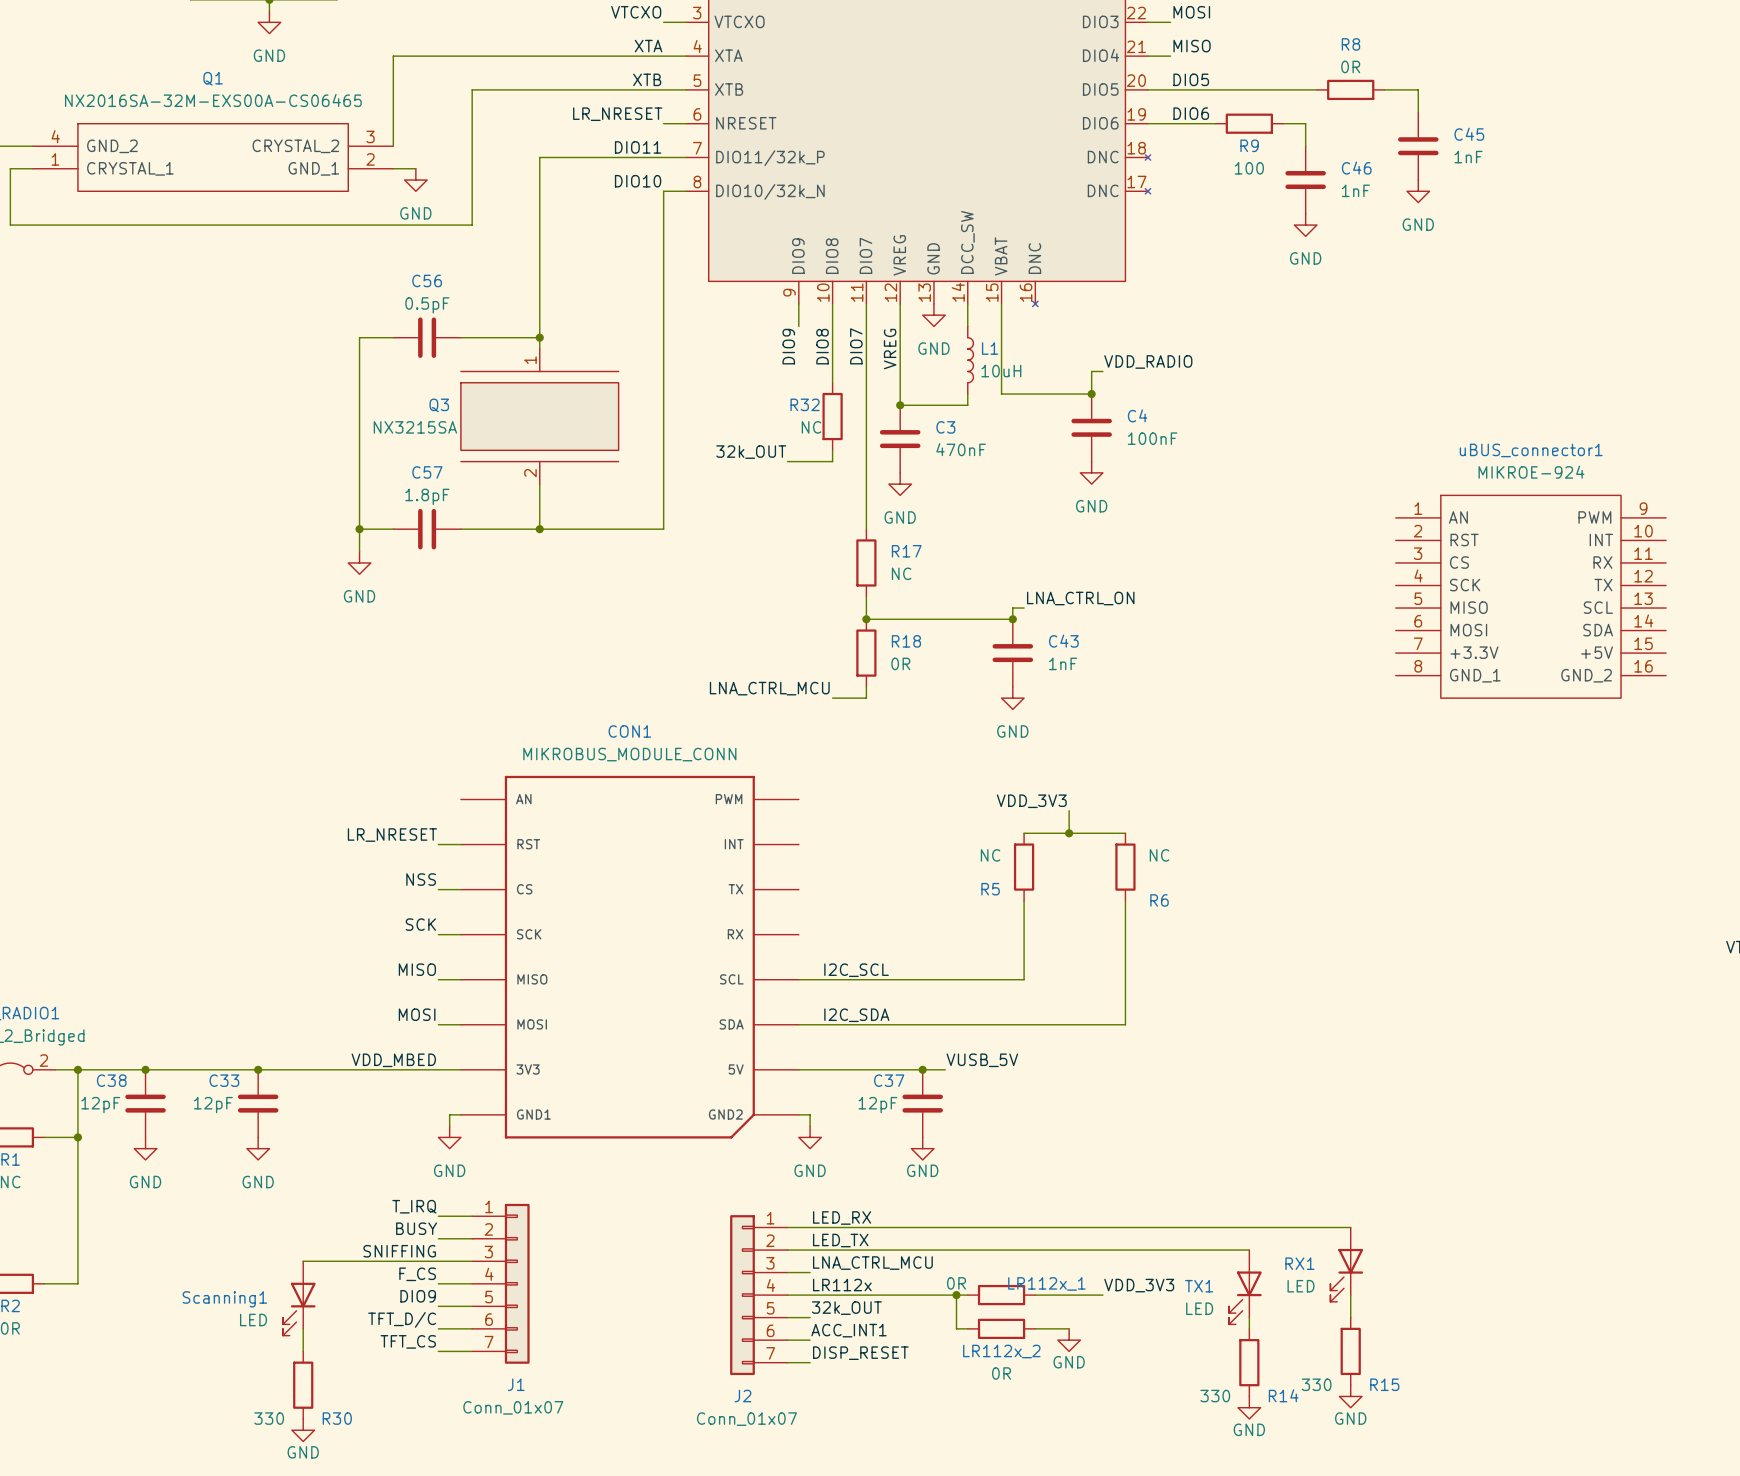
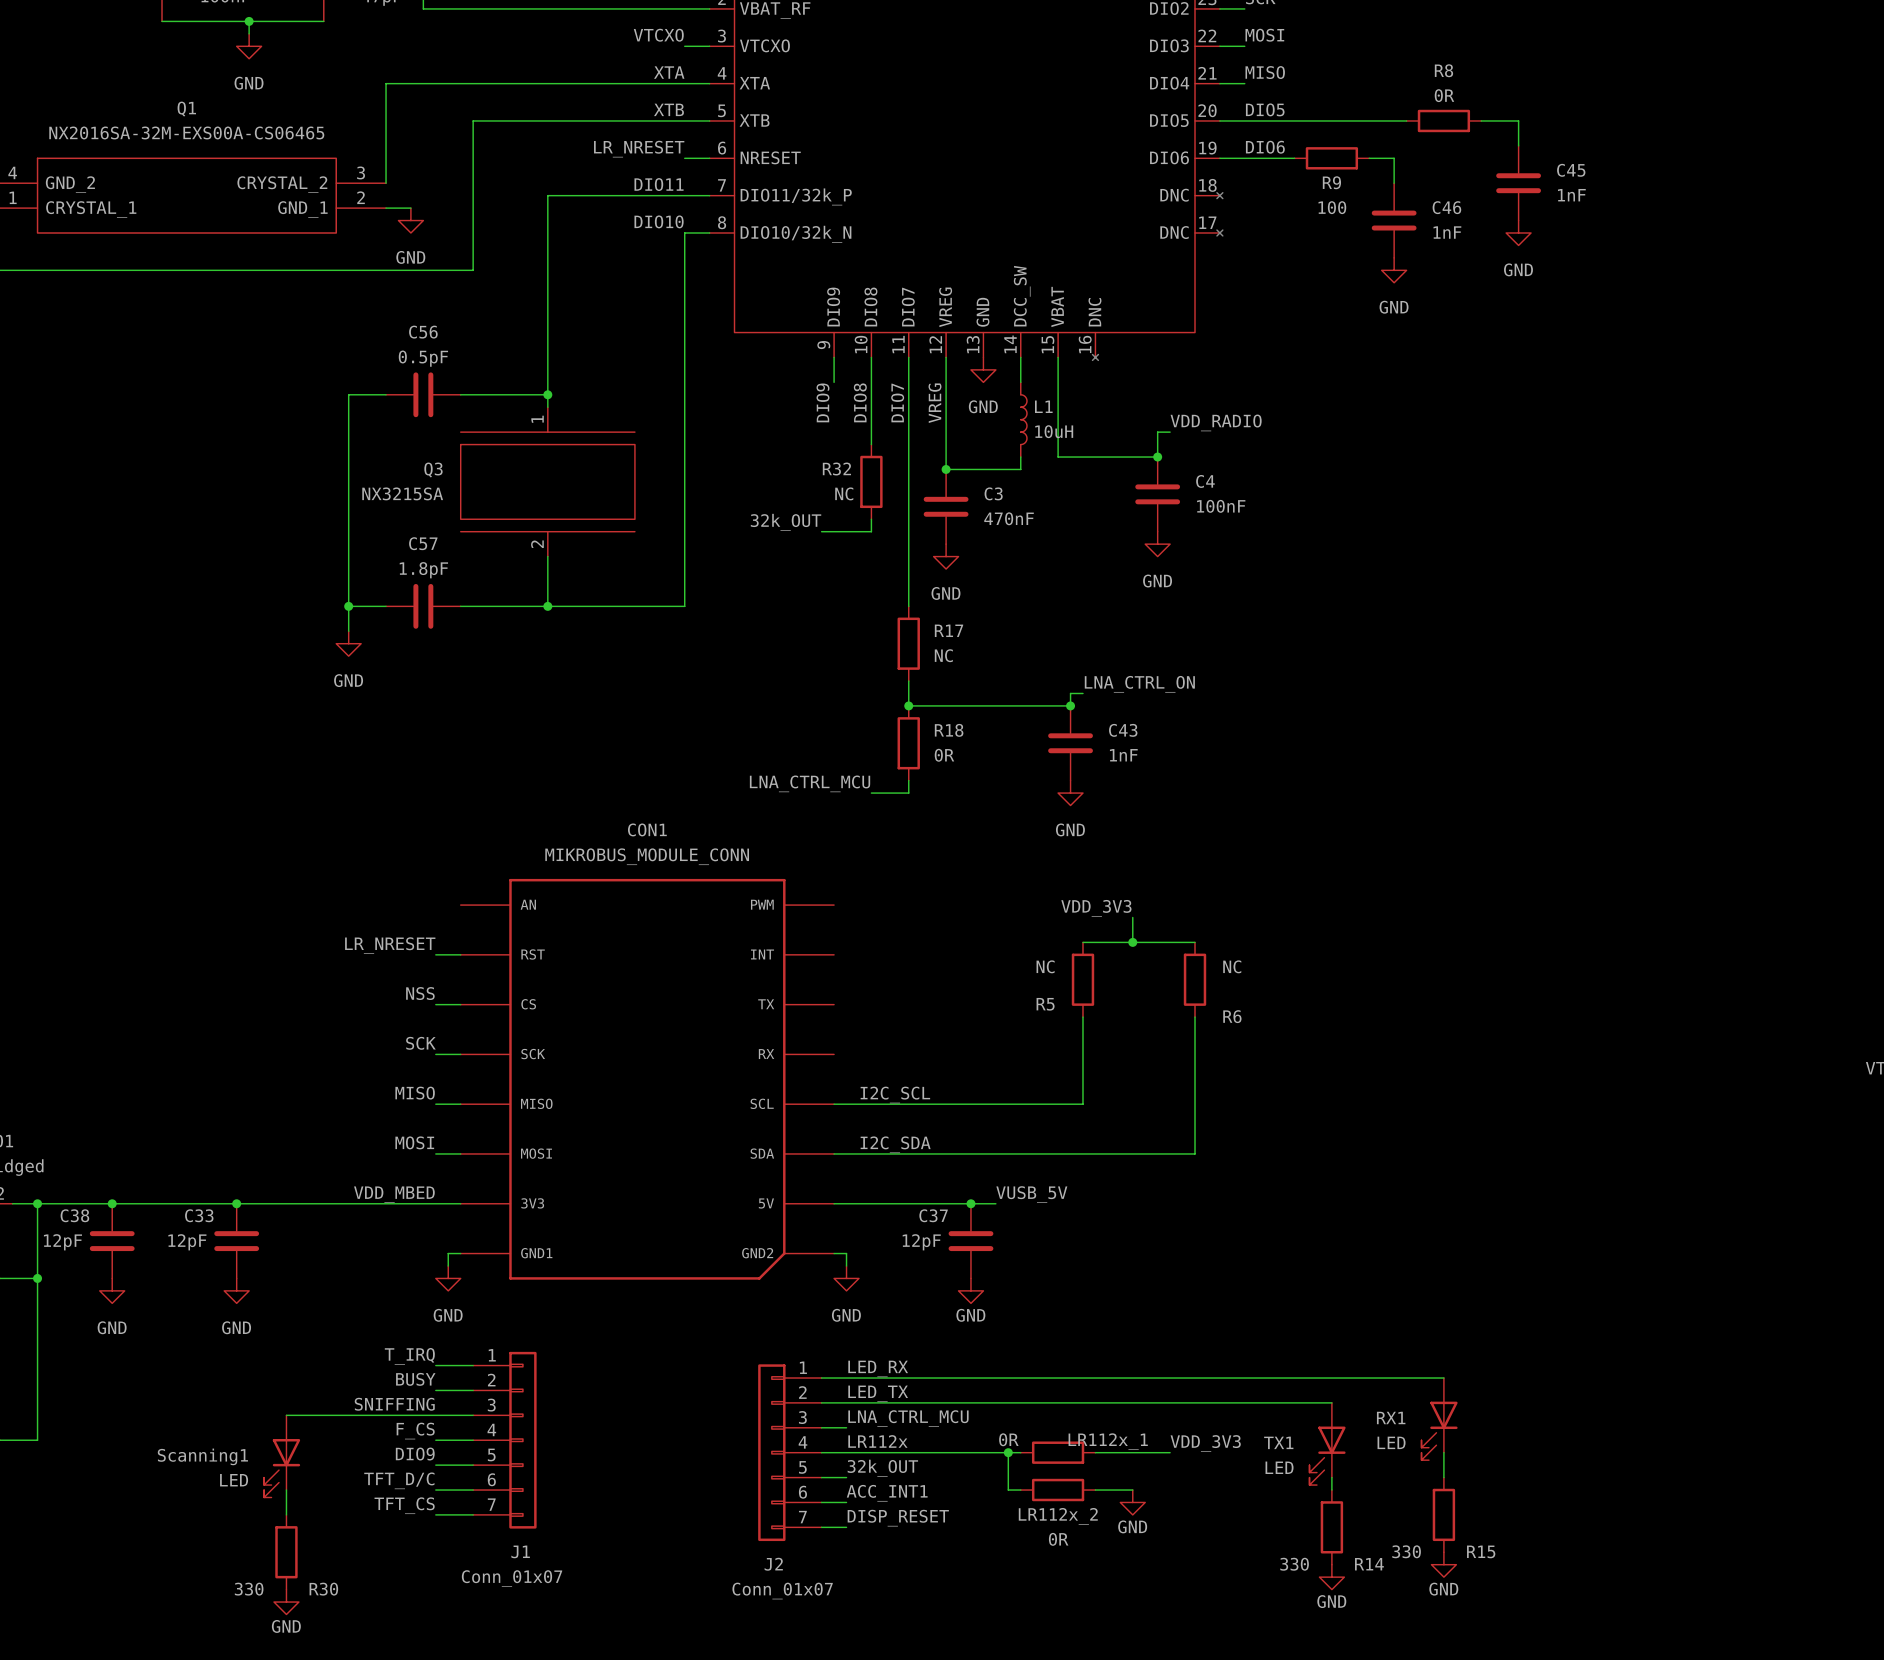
uBUS_connector1: MIKROE-924 (1530, 596) -> none

